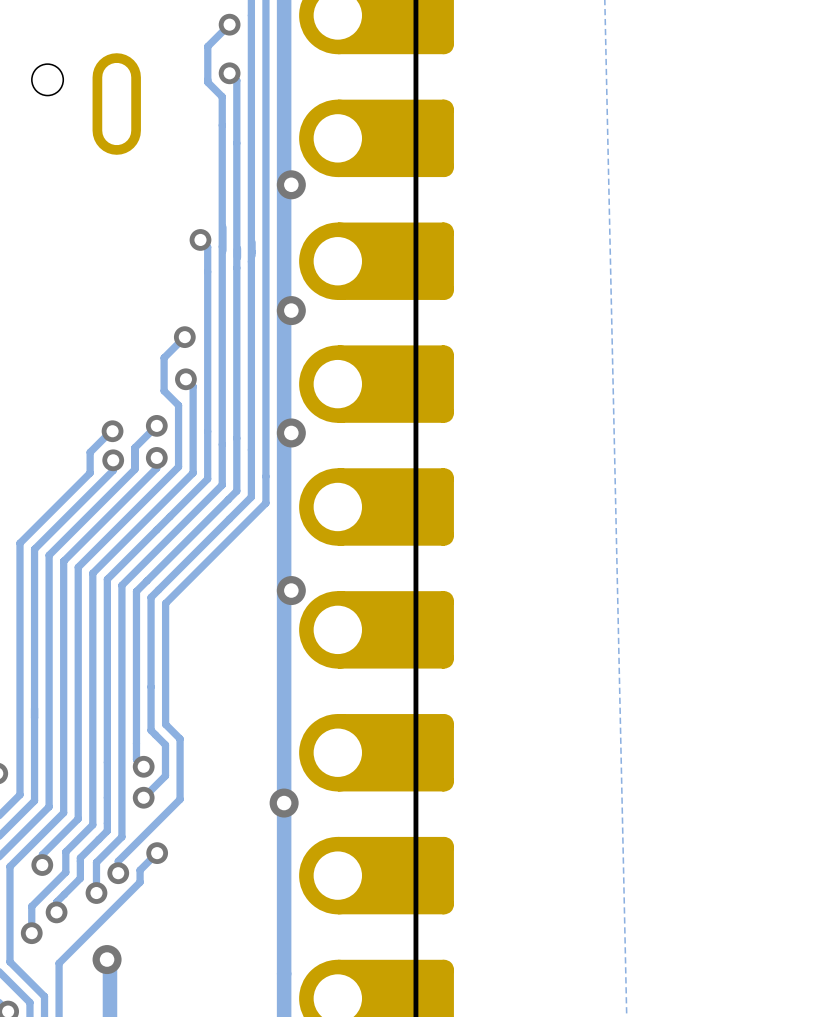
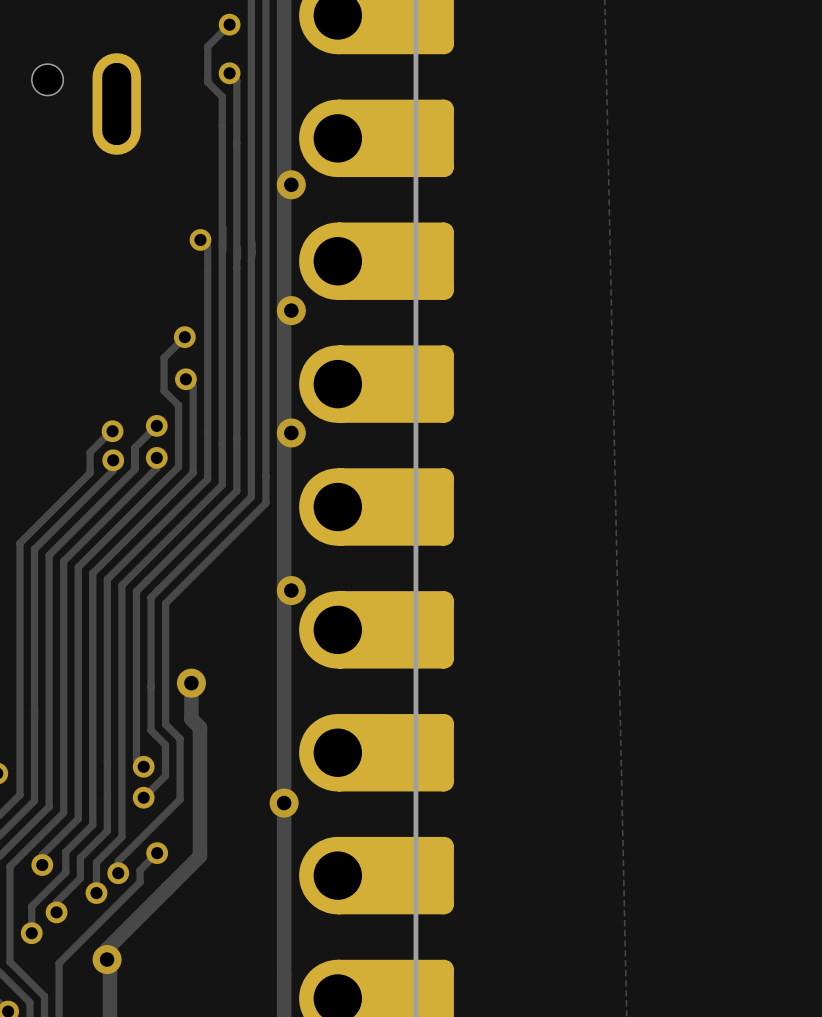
track: none -> (191, 683) (191, 719) (199, 727) (199, 856) (107, 949) (107, 959)
via: none -> (191, 683)

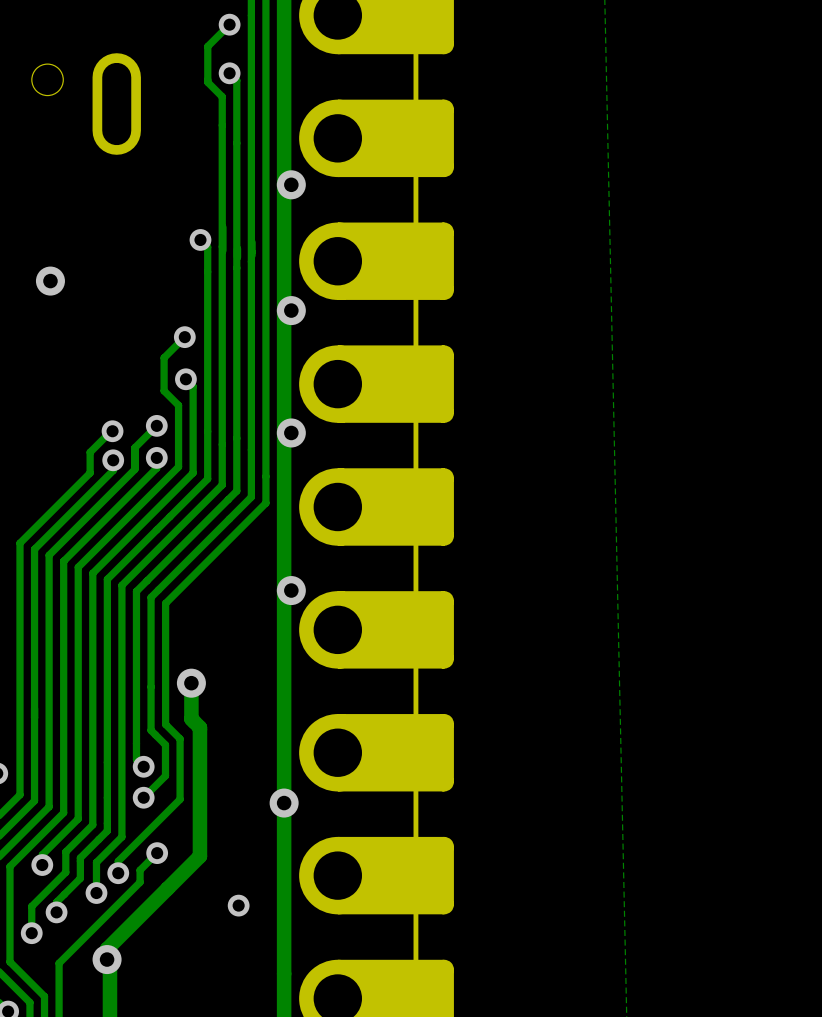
via: none -> (50, 281)
via: none -> (238, 905)

